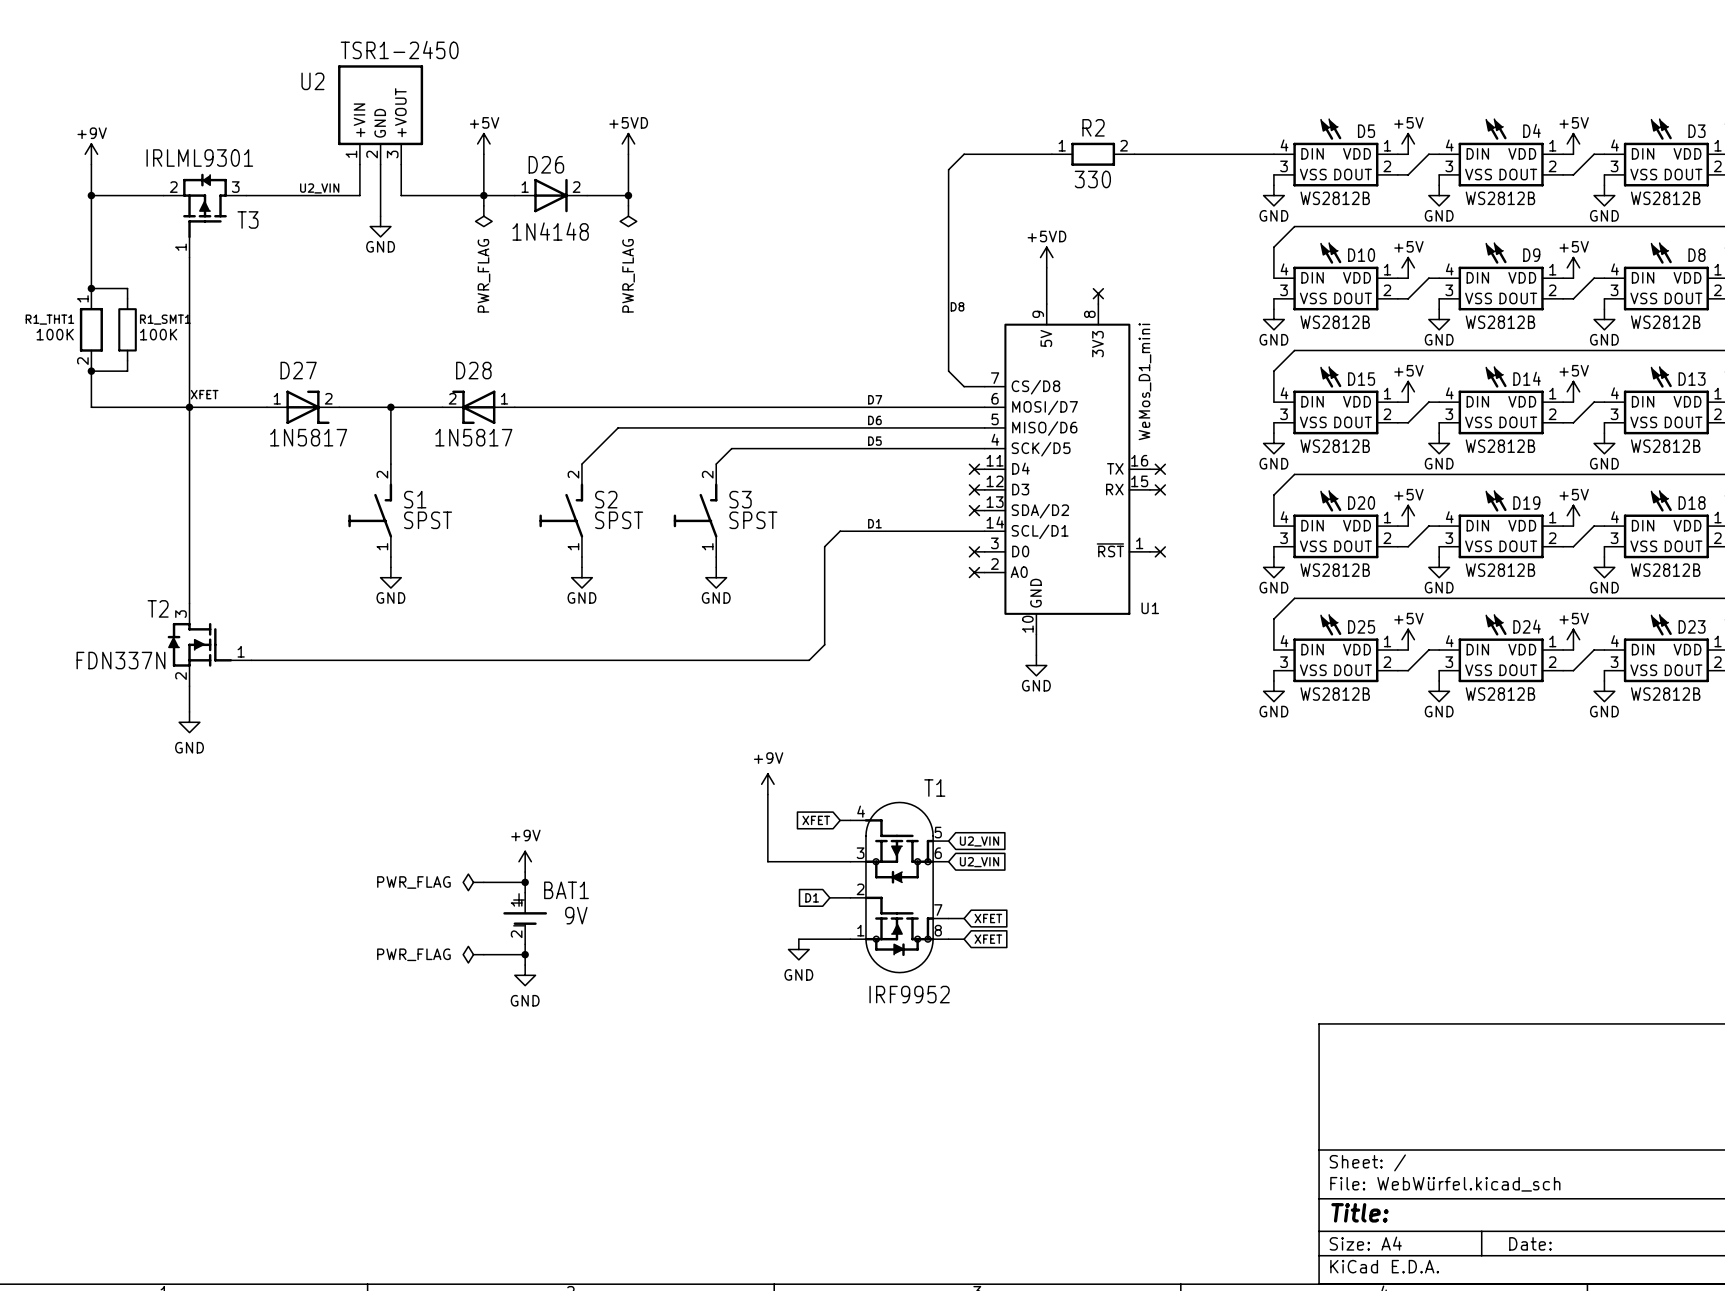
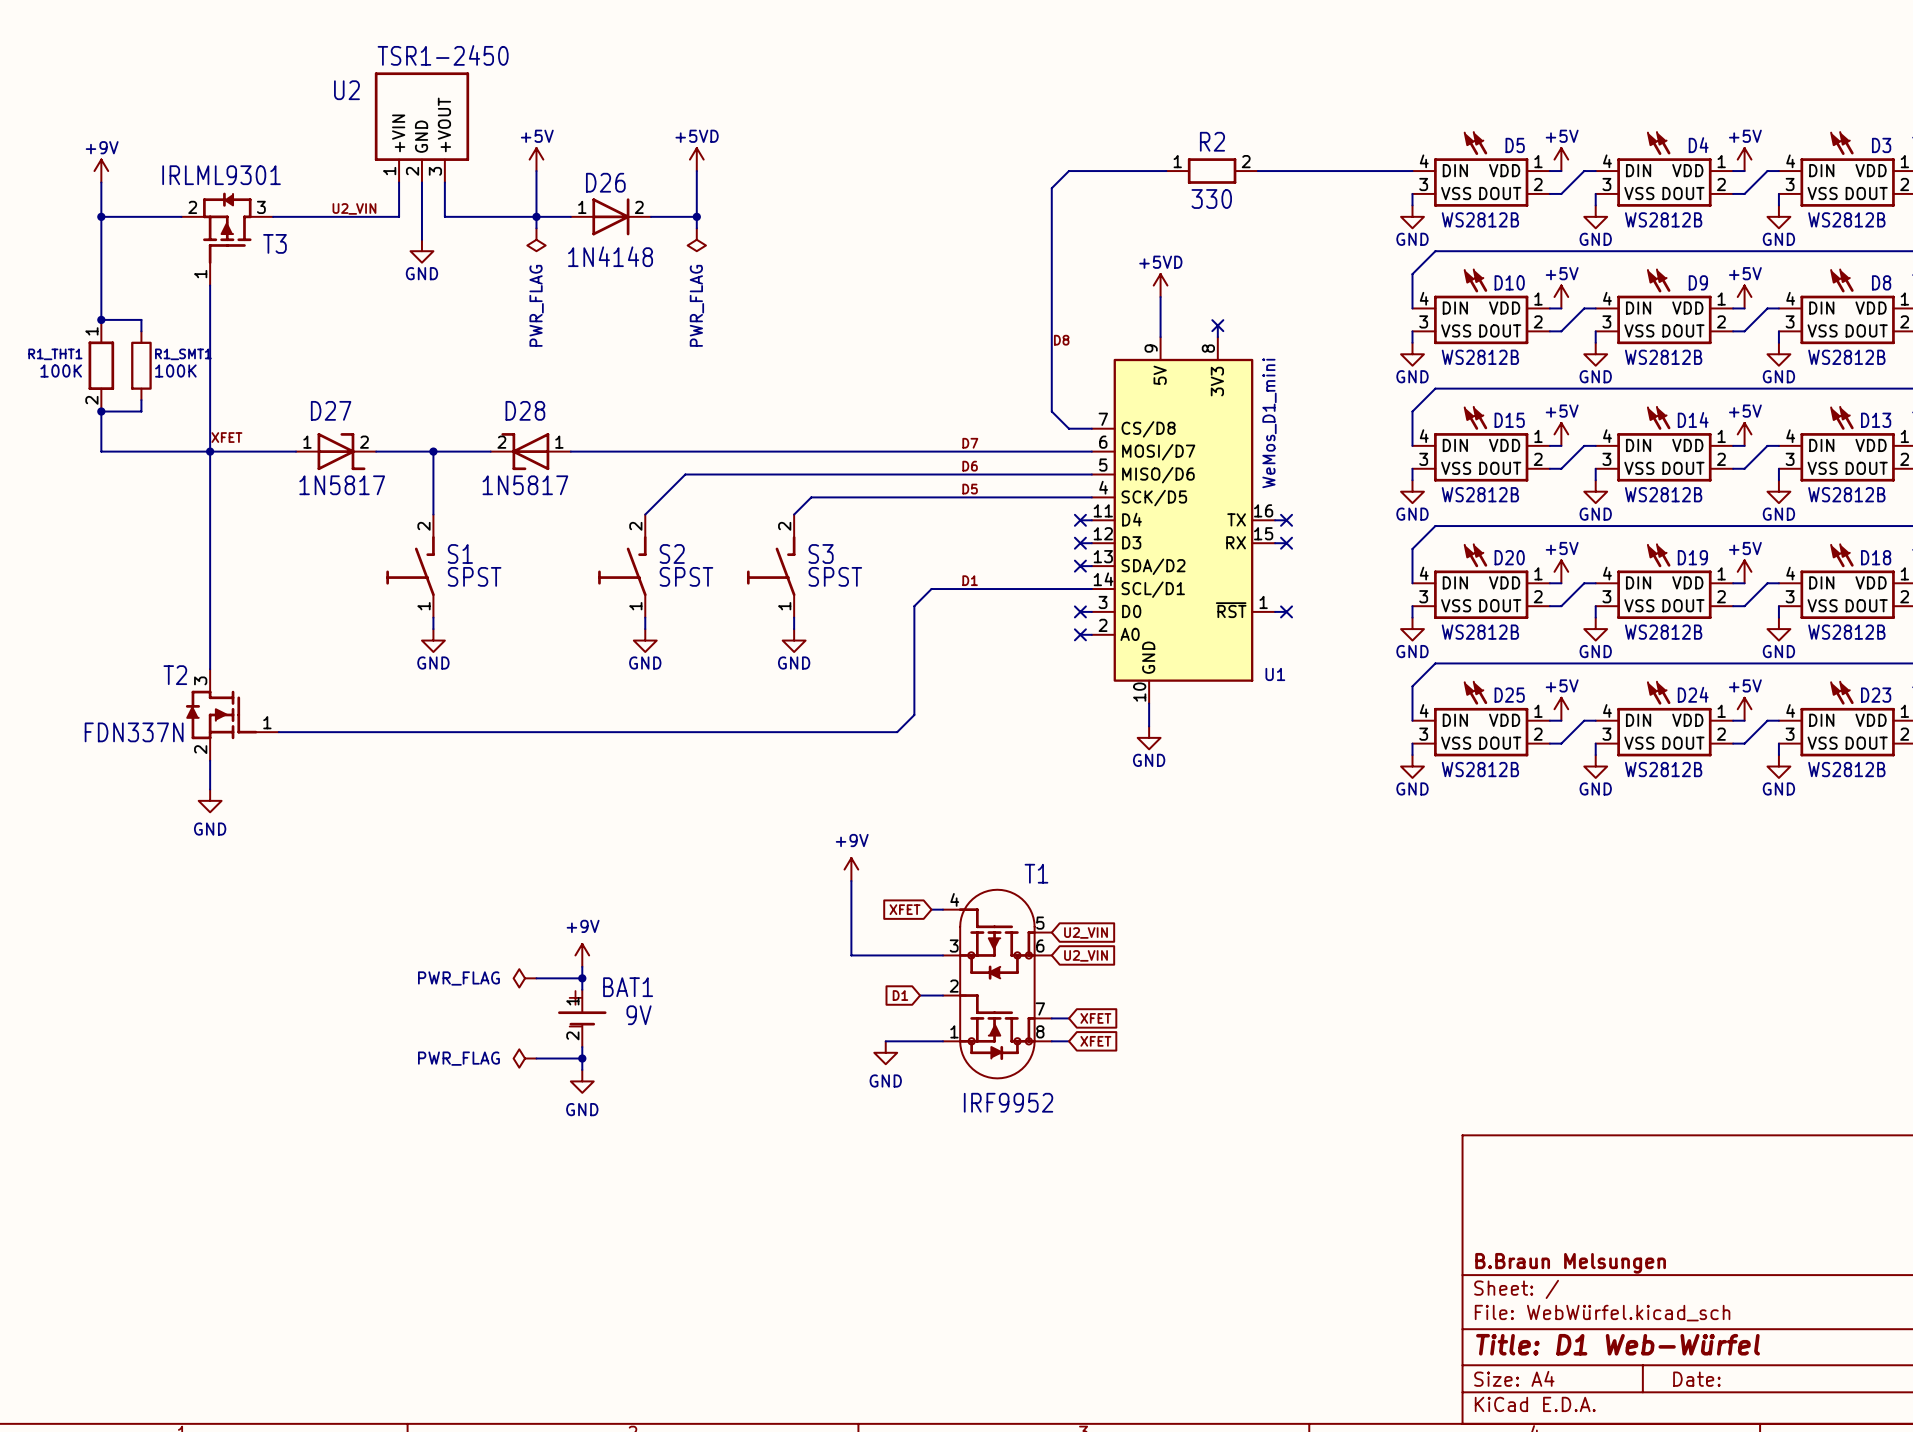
title block: none -> B.Braun Melsungen (1570, 1263)
title block: Title: (1359, 1212) -> Title: D1 Web-Würfel (1618, 1344)

